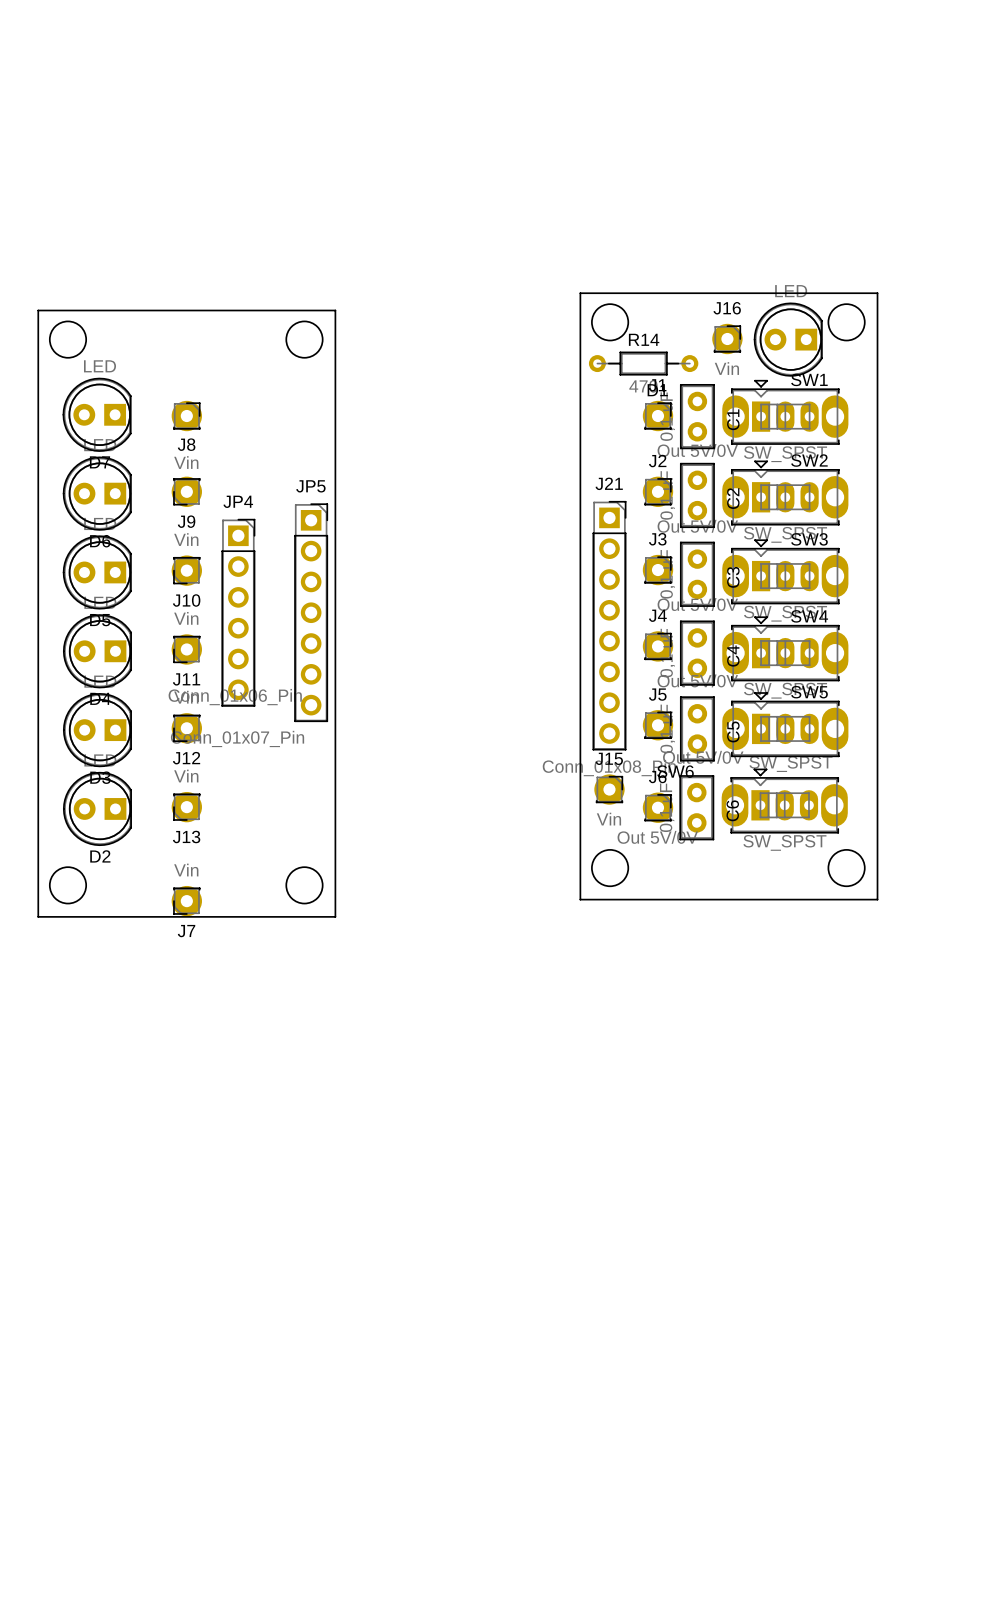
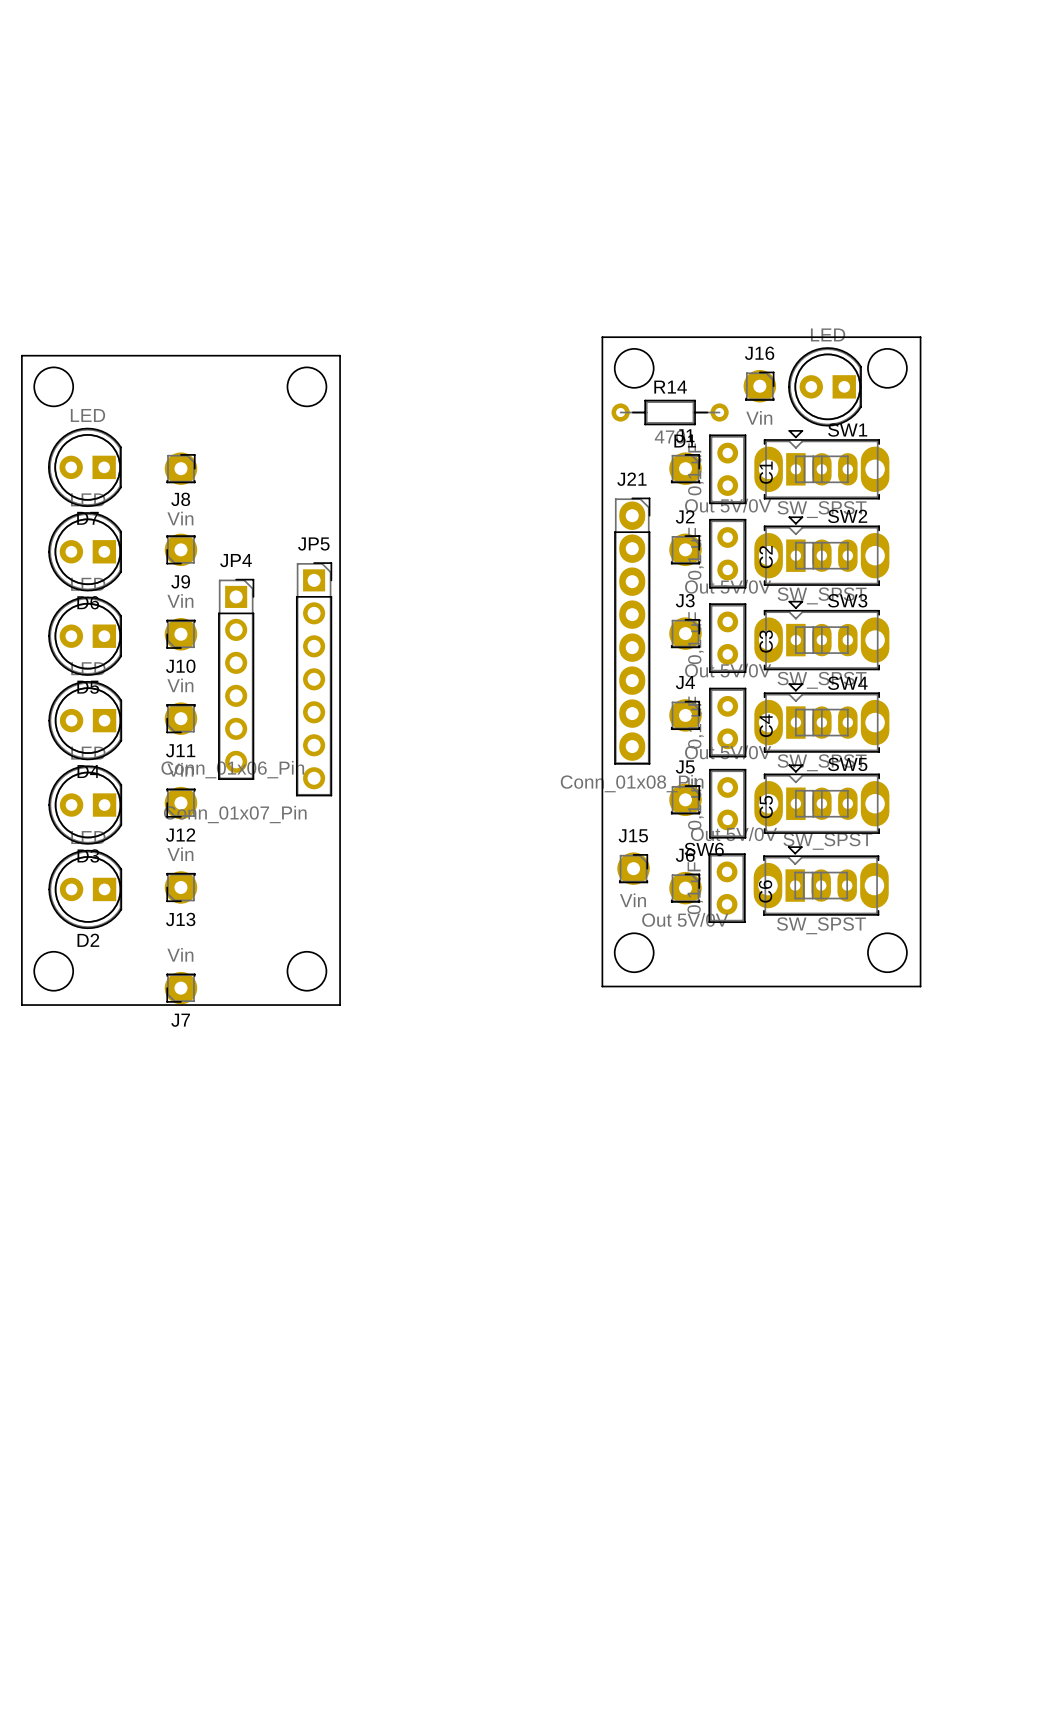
J21 footprint: [592, 501, 627, 751] -> [614, 497, 651, 765]

